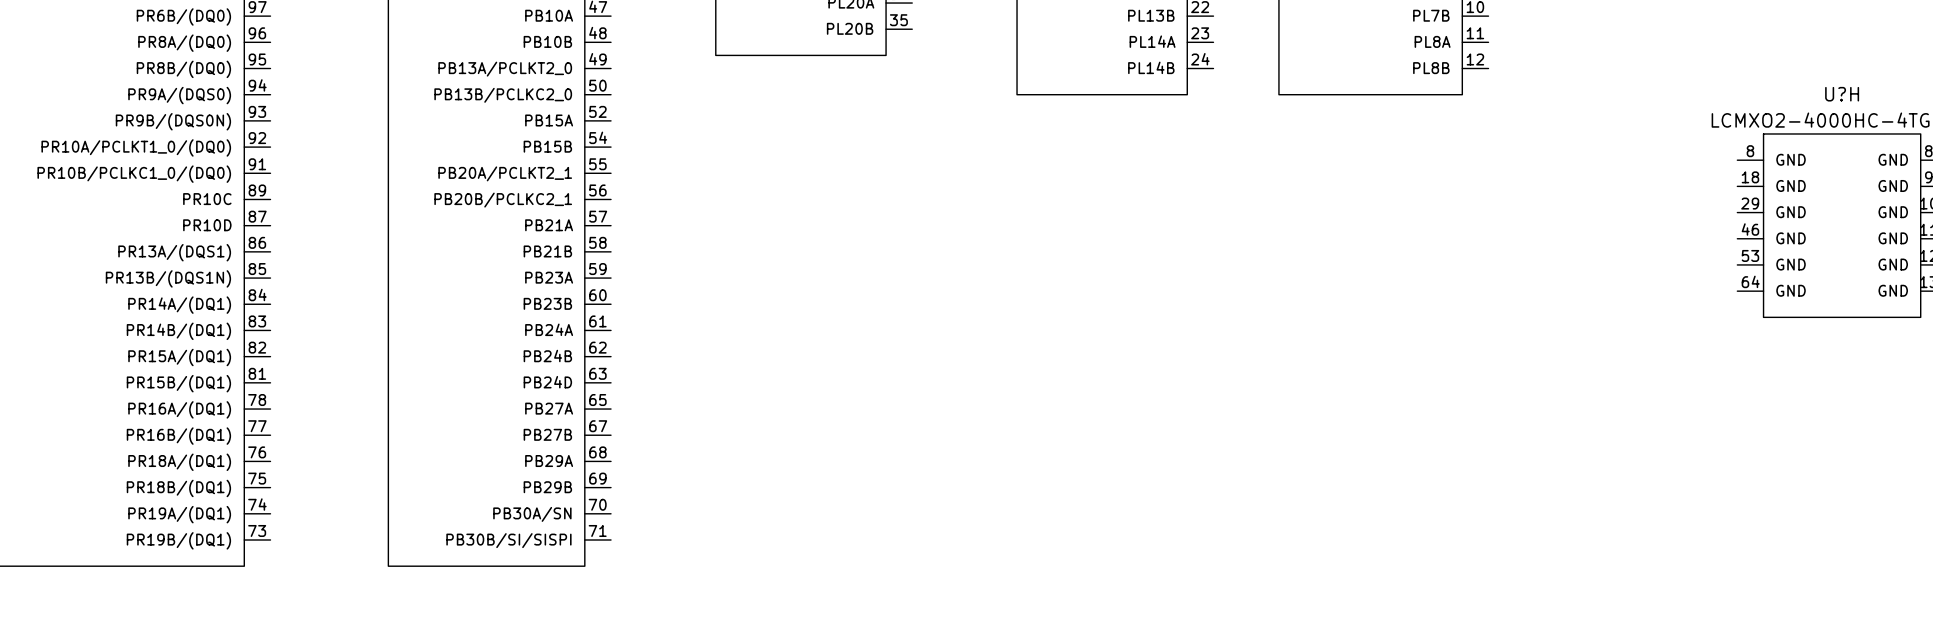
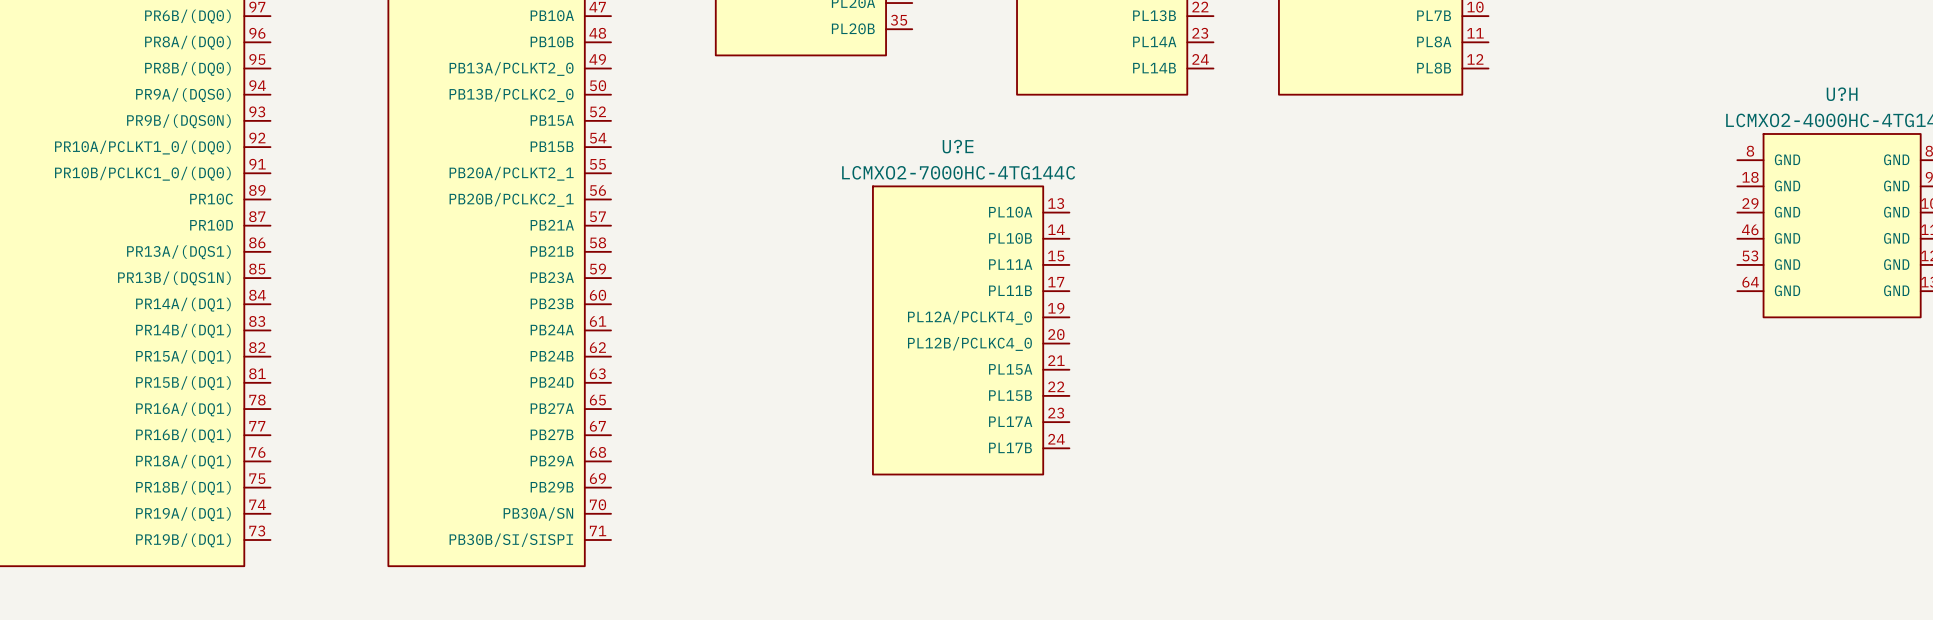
U?E: none -> LCMXO2-7000HC-4TG144C (971, 330)

